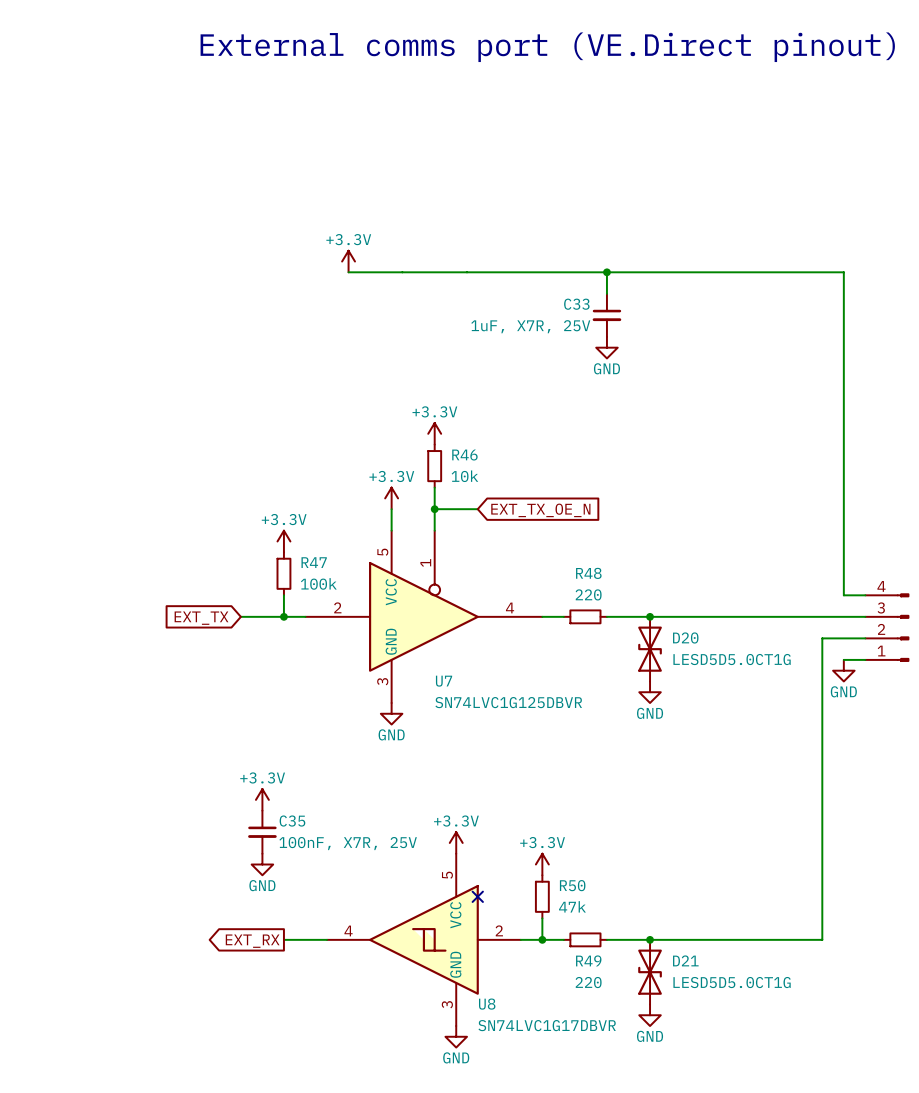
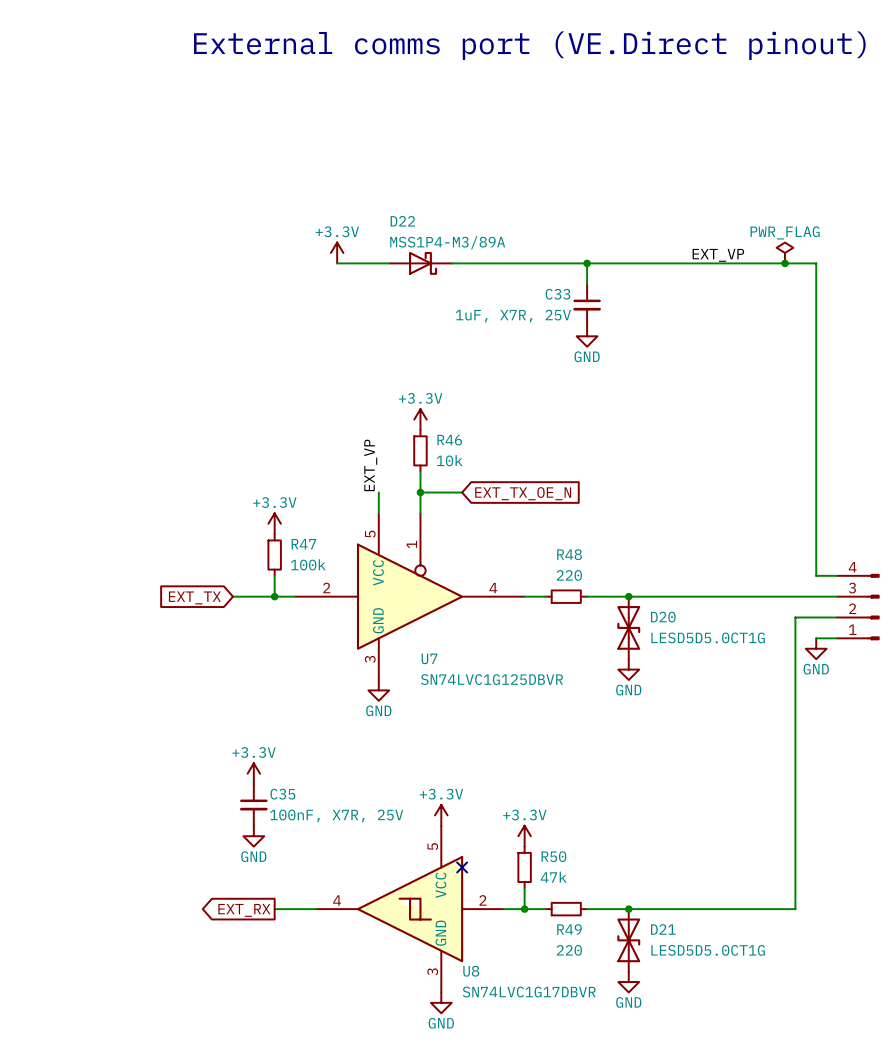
power symbol: none -> PWR_FLAG (784, 252)
label: none -> EXT_VP (718, 255)
D22: none -> MSS1P4-M3/89A (420, 263)
junction: none -> (784, 263)
label: none -> EXT_VP (370, 465)
power symbol: +3.3V (391, 498) -> none

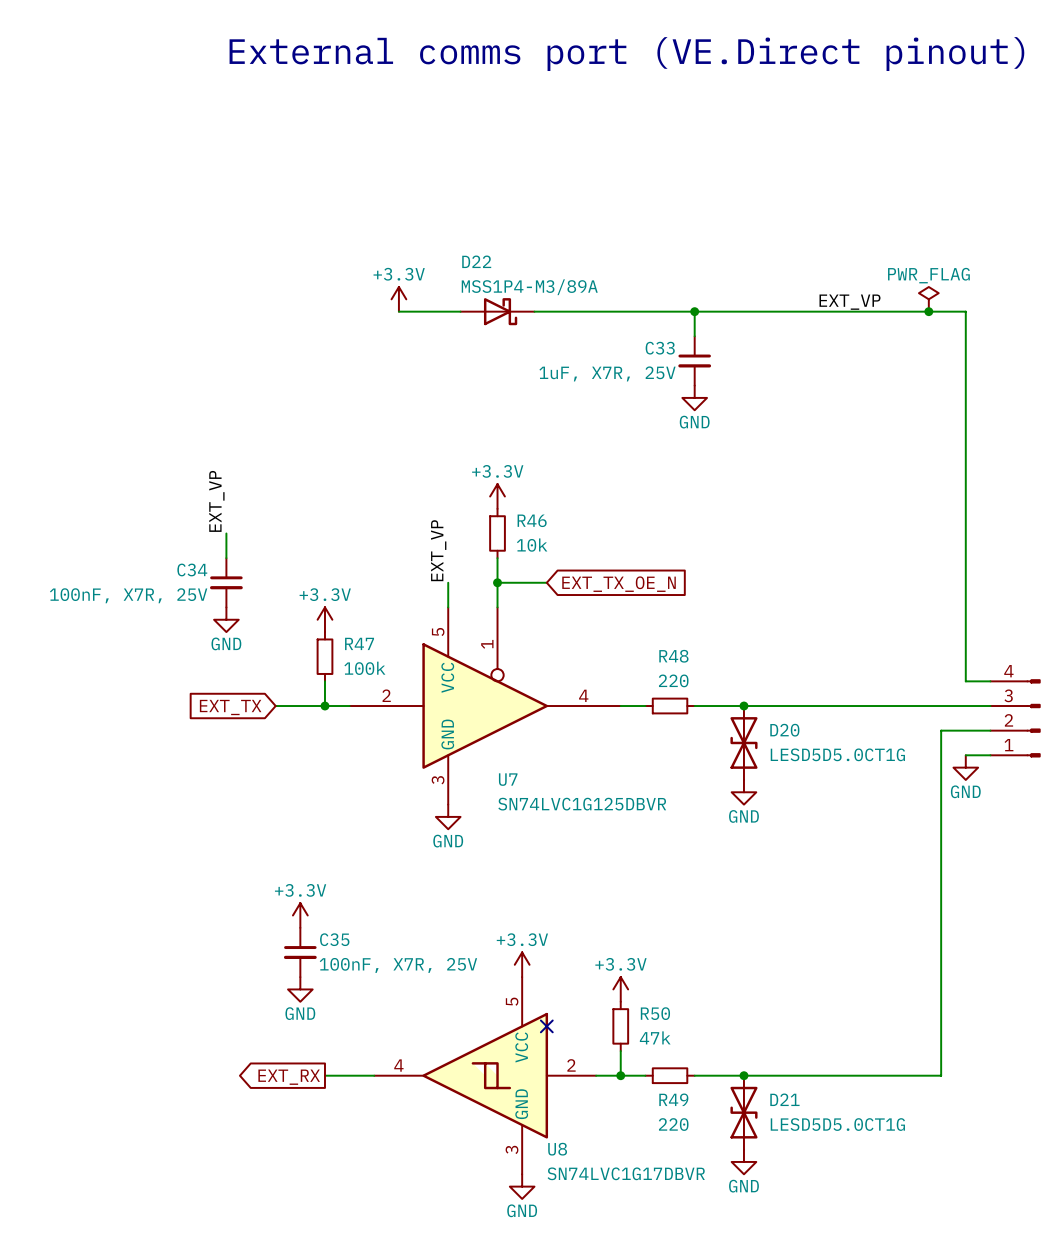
label: none -> EXT_VP (216, 501)
wire: none -> (226, 533) (226, 558)
C34: none -> 100nF, X7R, 25V (226, 582)
power symbol: none -> GND (226, 619)

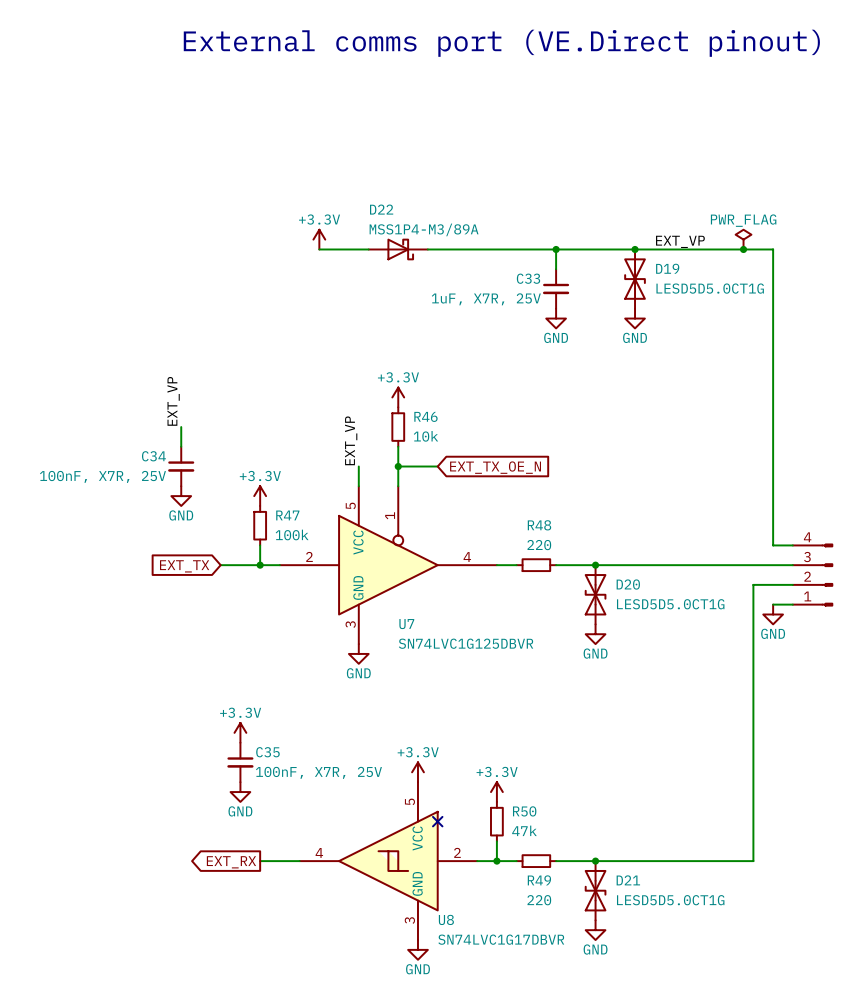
junction: none -> (635, 249)
D19: none -> LESD5D5.0CT1G (635, 279)
power symbol: none -> GND (635, 318)

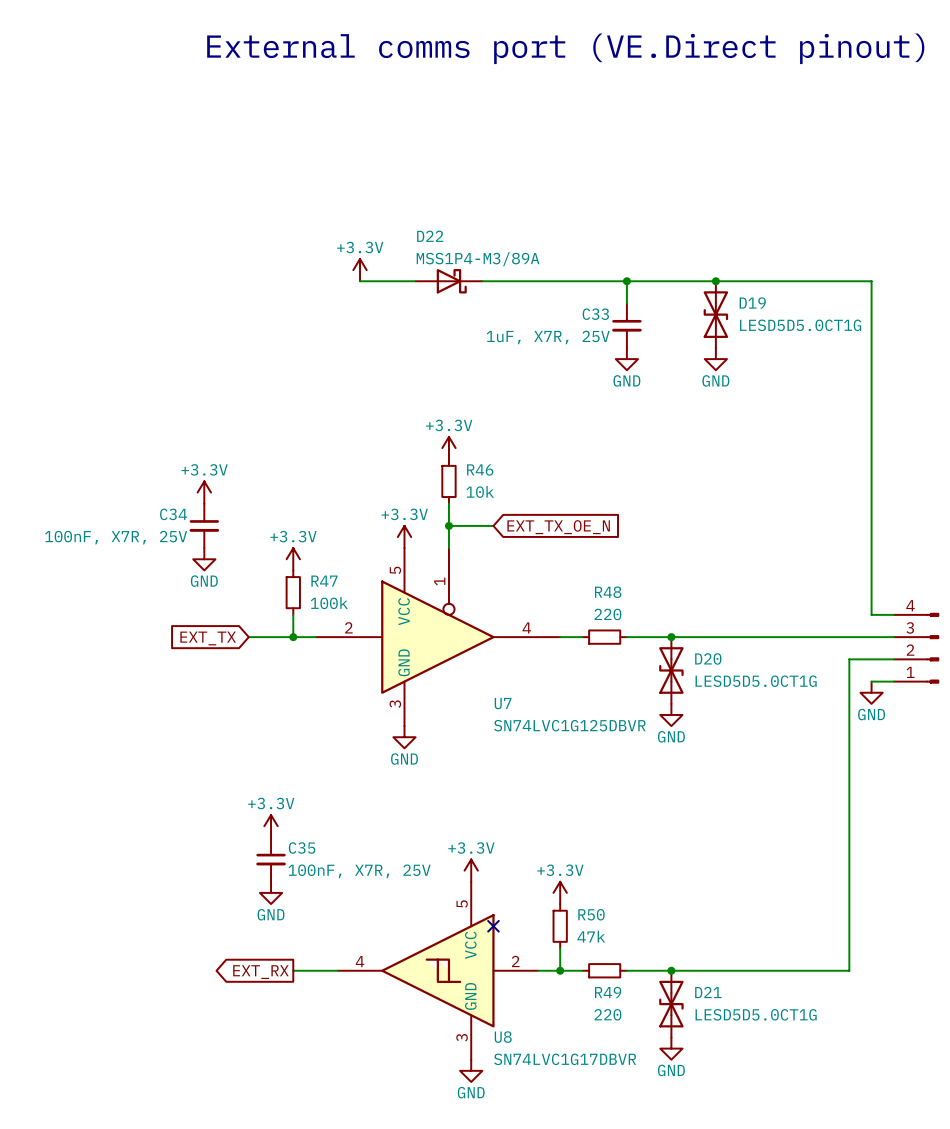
power symbol: PWR_FLAG (743, 239) -> none
label: EXT_VP (680, 241) -> none
junction: (743, 249) -> none
label: EXT_VP (173, 401) -> none
power symbol: none -> +3.3V (204, 492)
label: EXT_VP (351, 440) -> none
power symbol: none -> +3.3V (404, 537)
U7 name position: U7 (406, 624) -> U7 (503, 703)
U7 value position: SN74LVC1G125DBVR (466, 643) -> SN74LVC1G125DBVR (569, 725)

